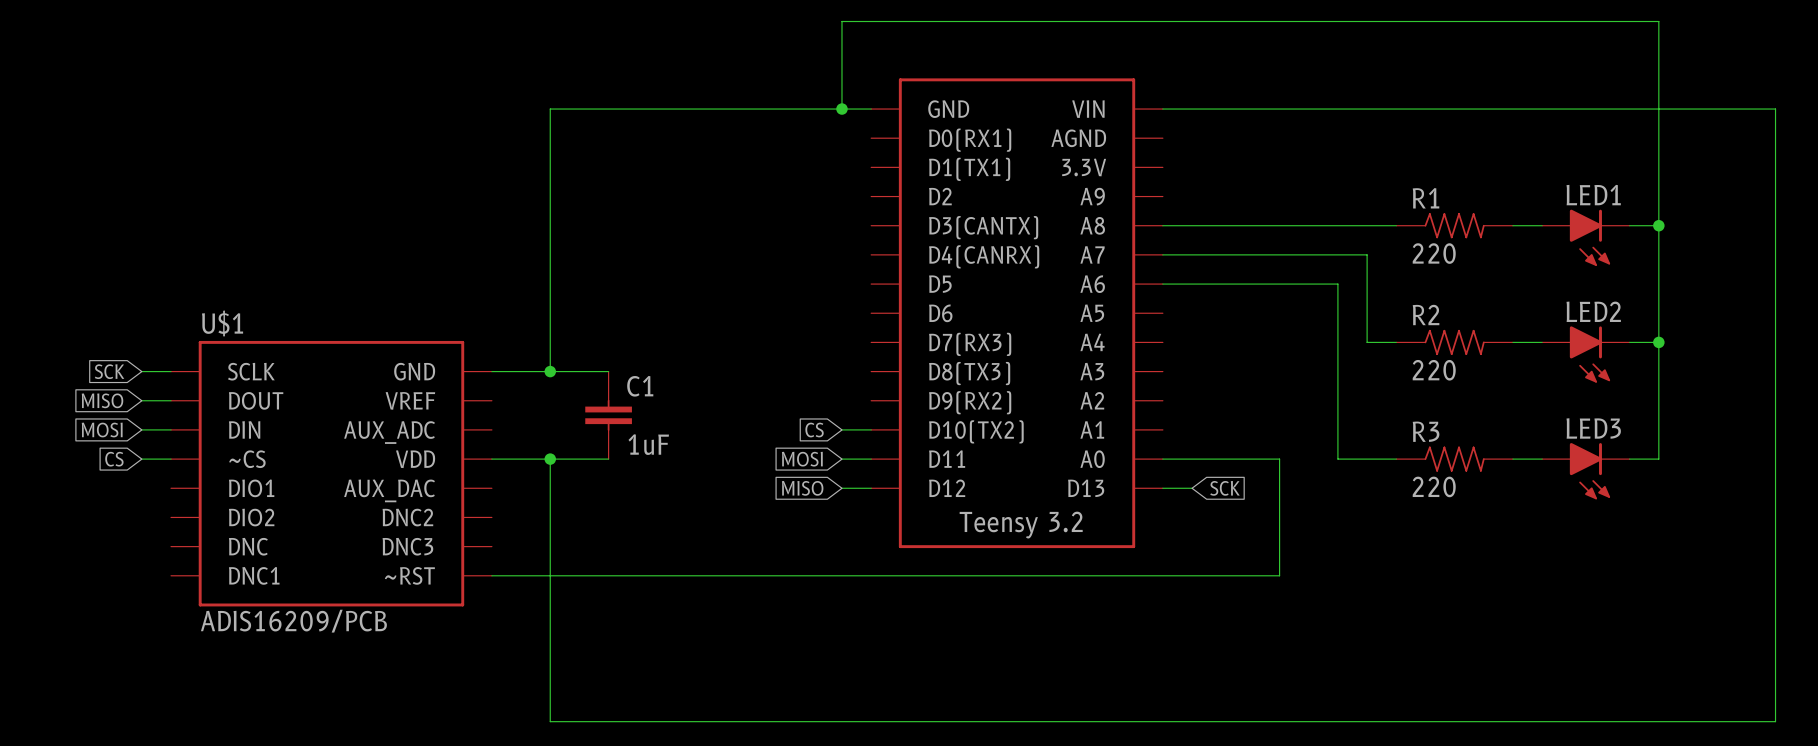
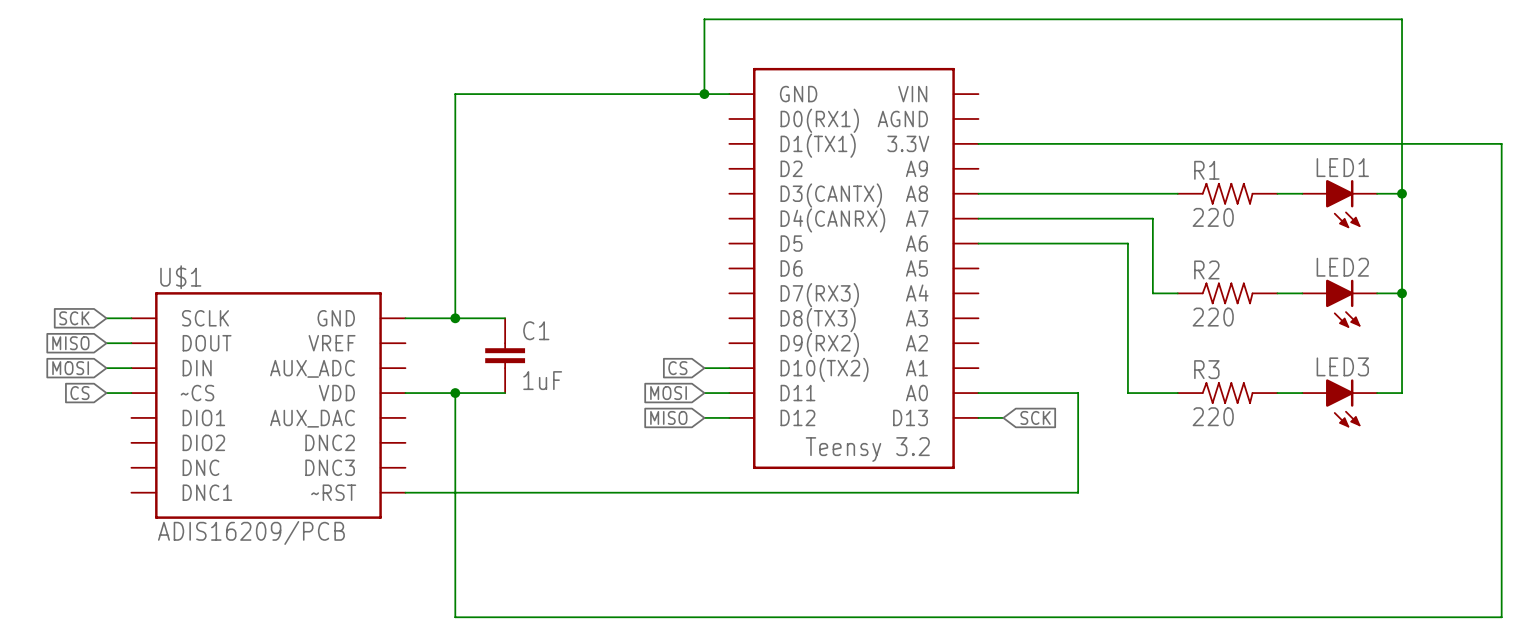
wire: (1162, 109) (1775, 109) (1775, 167) -> (978, 143) (1501, 143)

